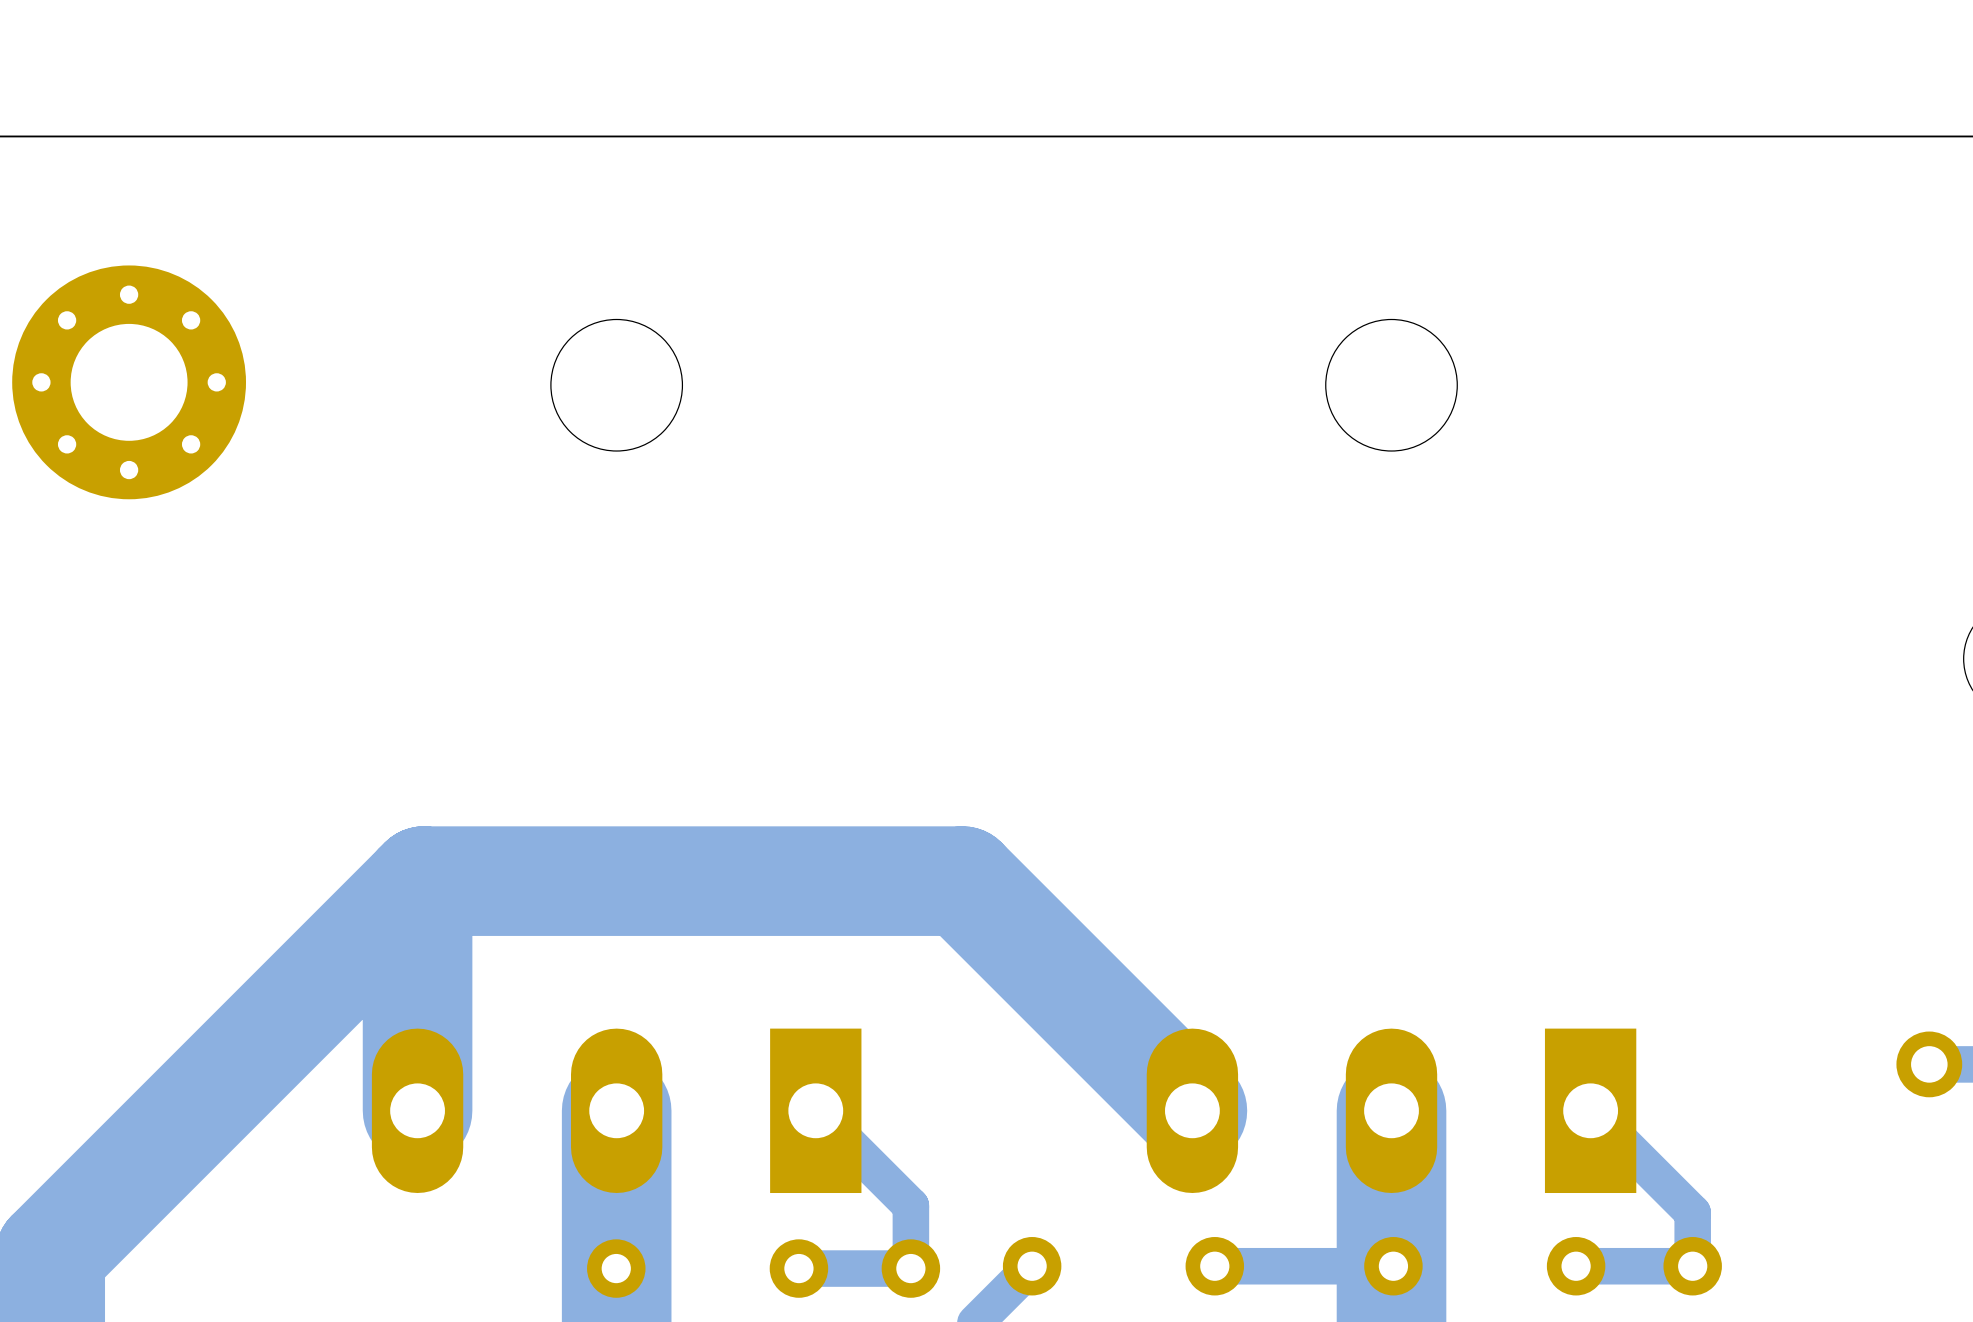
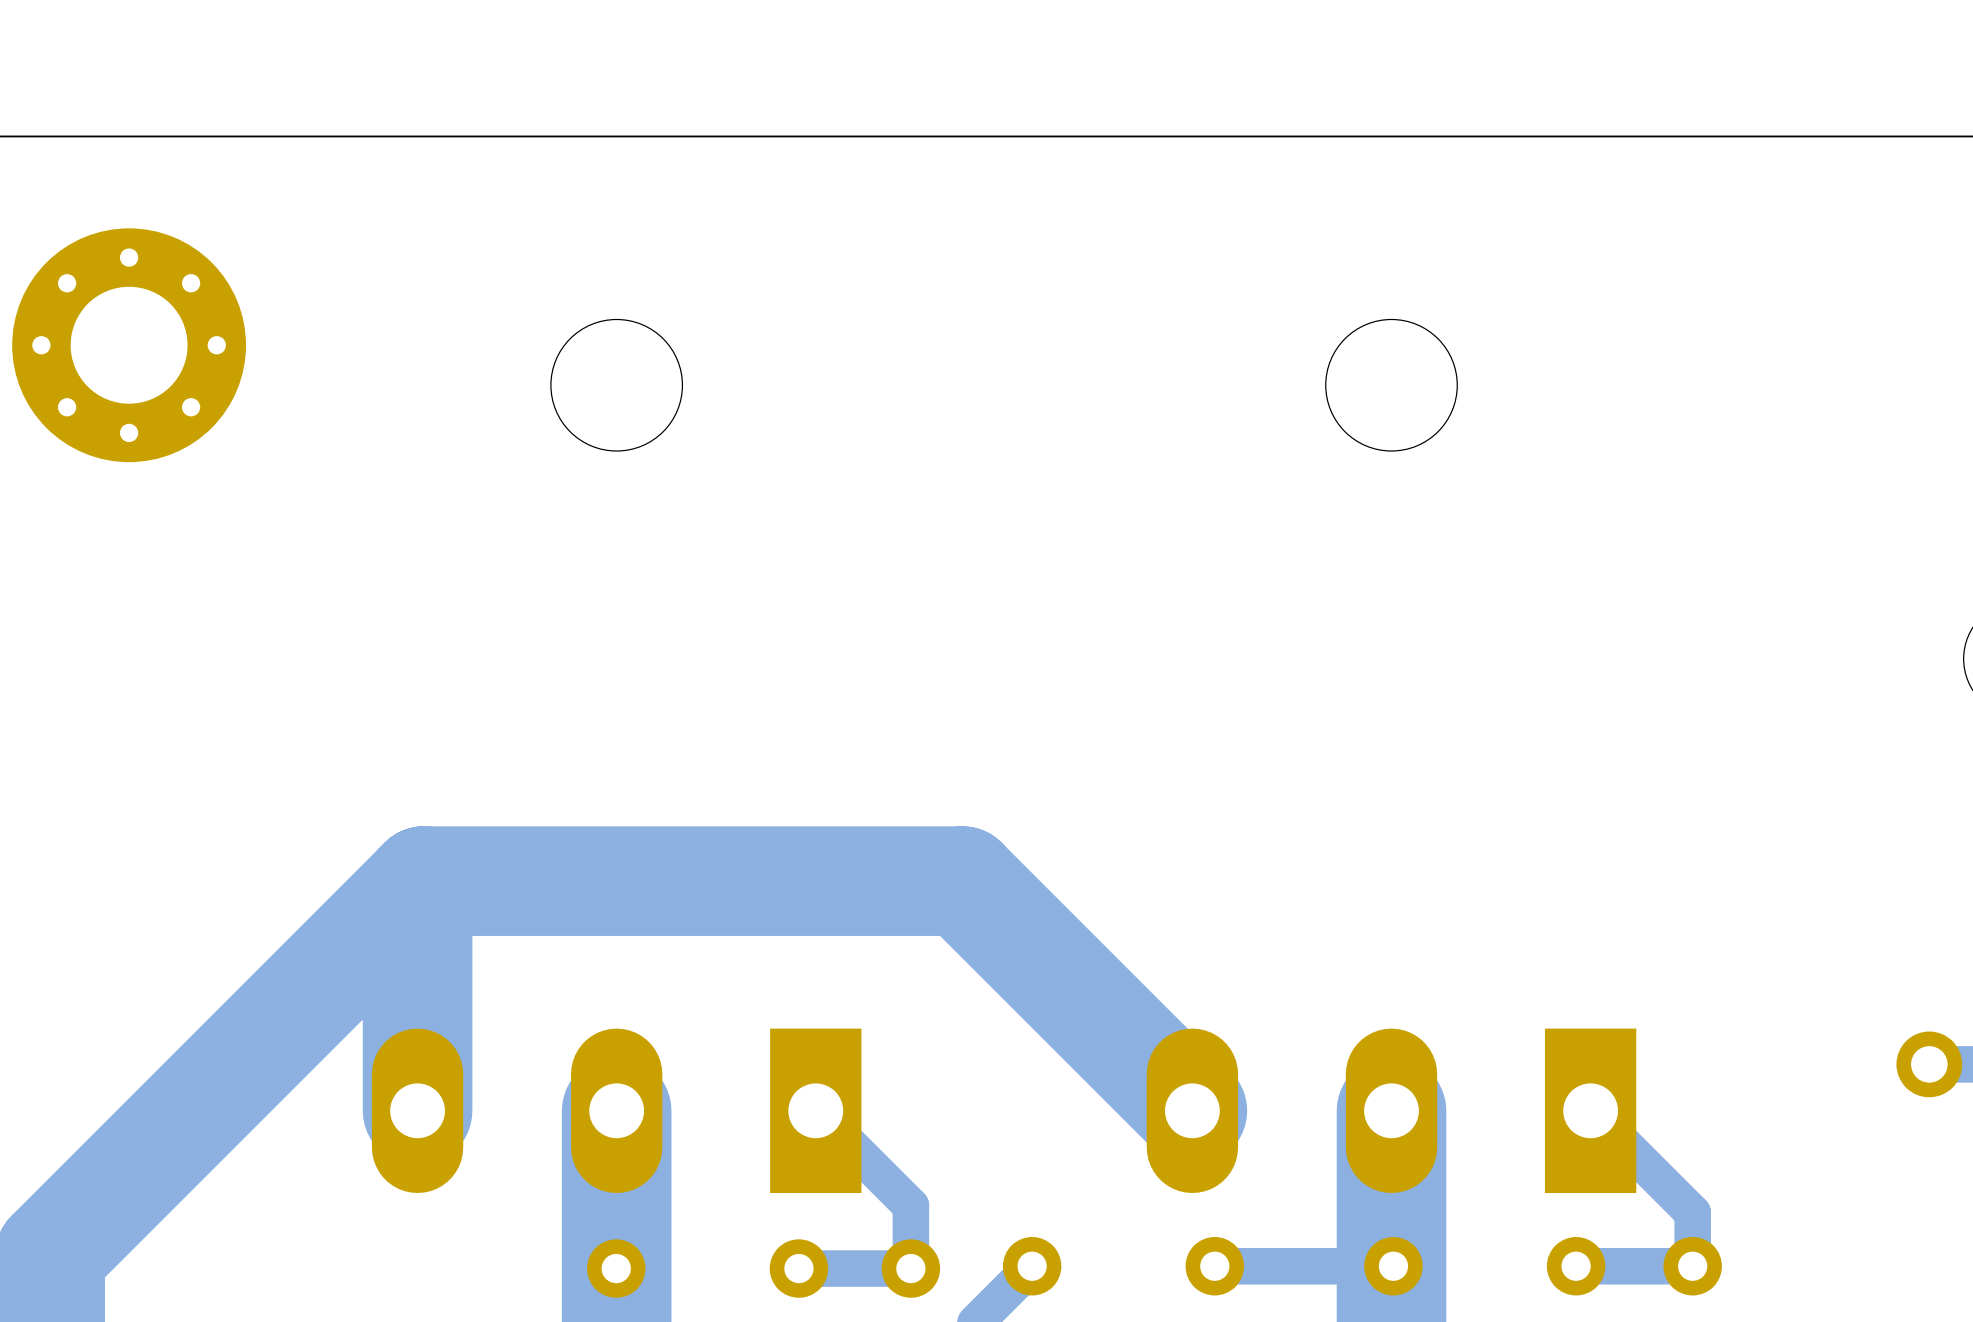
part position: (129, 382) -> (129, 345)

